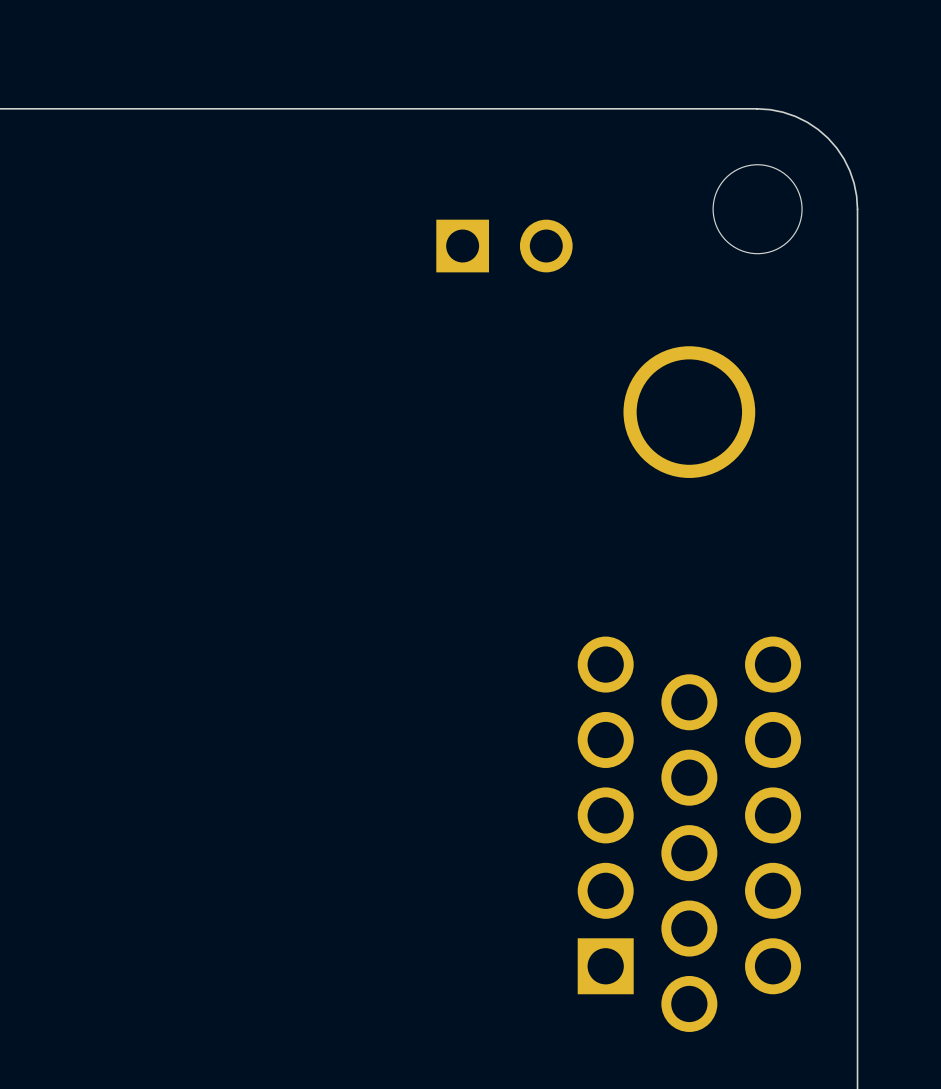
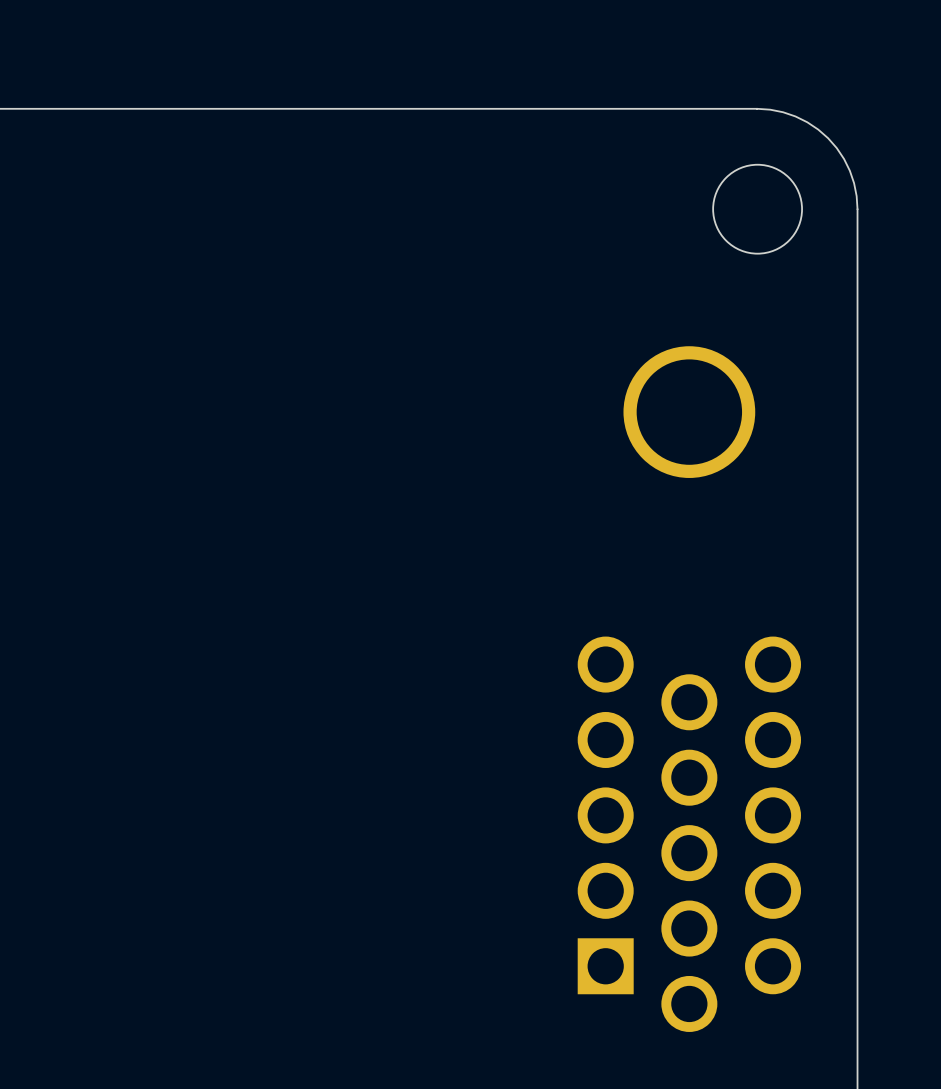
part: (504, 246) -> none

